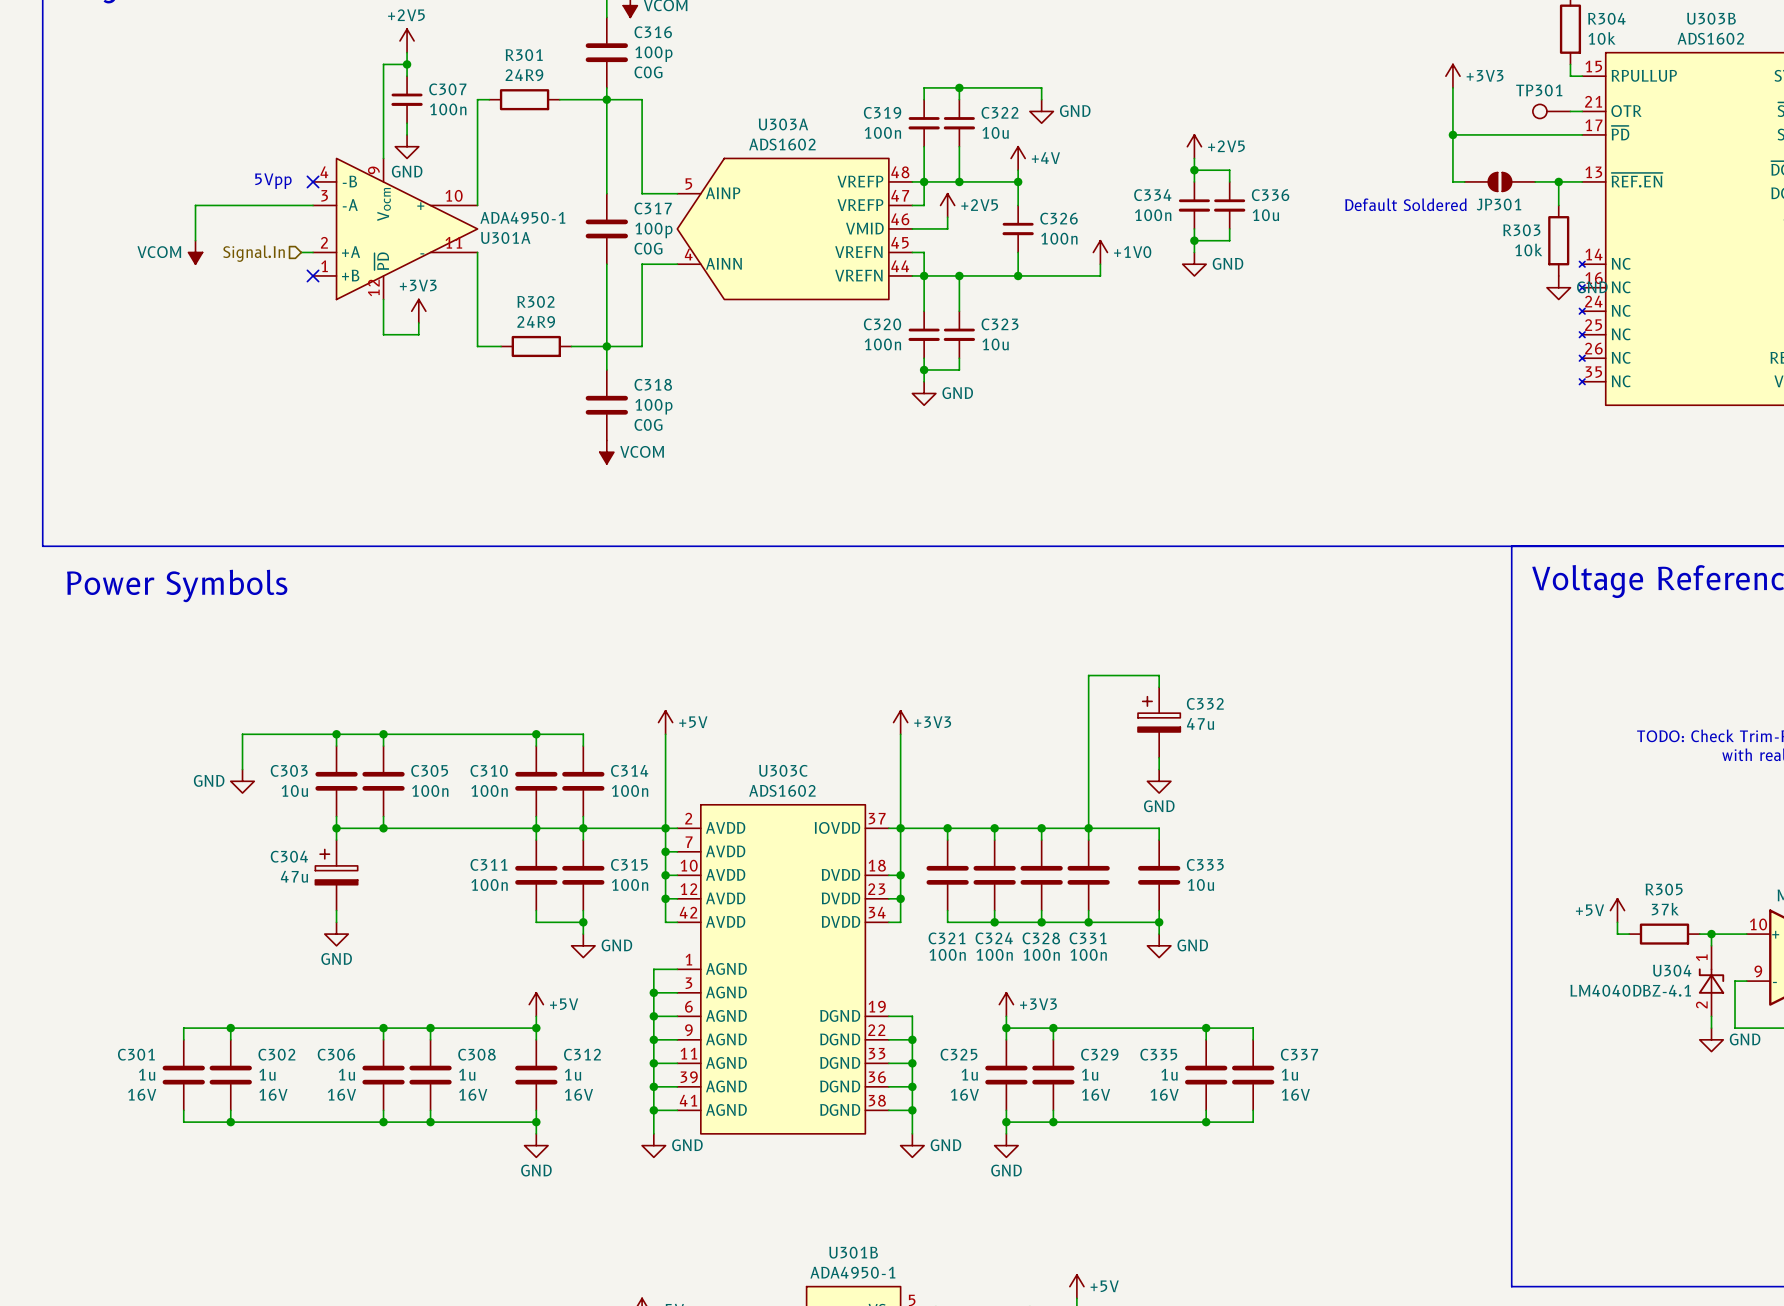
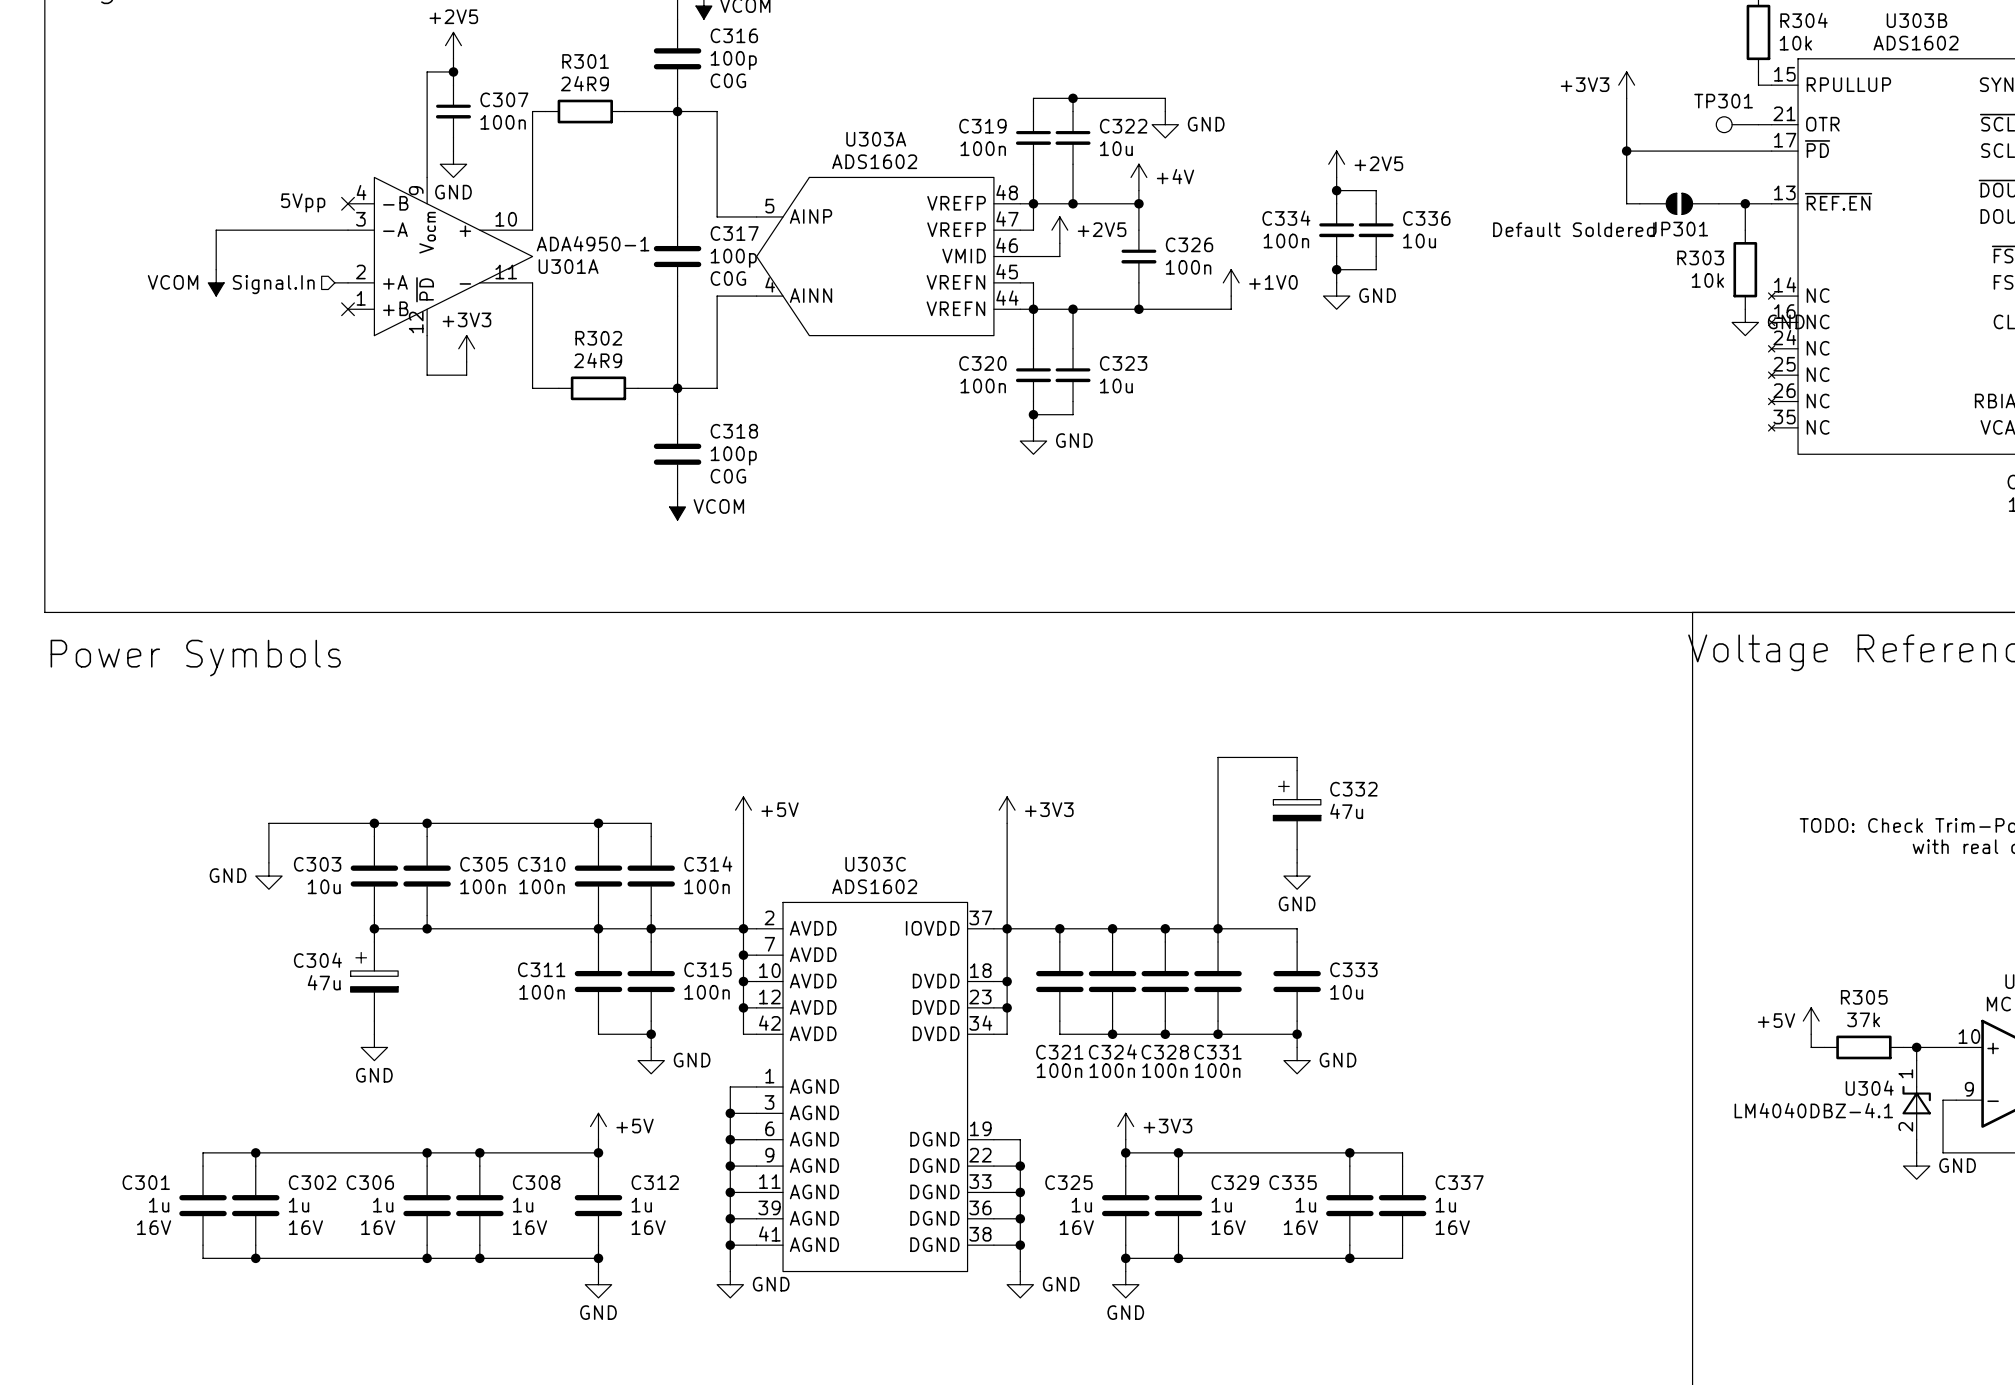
power symbol text position: +3V3 (1485, 75) -> +3V3 (1585, 84)

